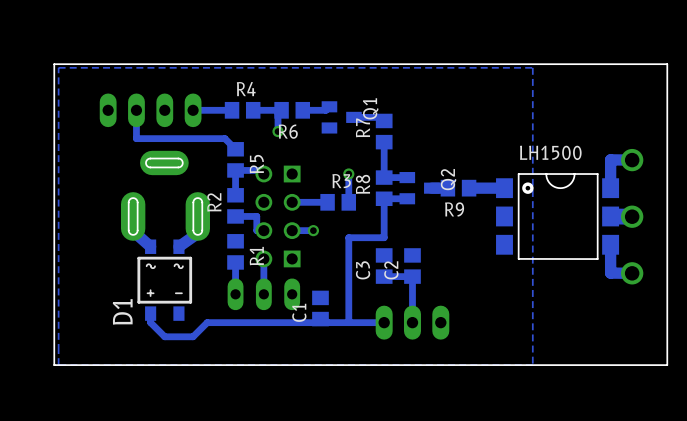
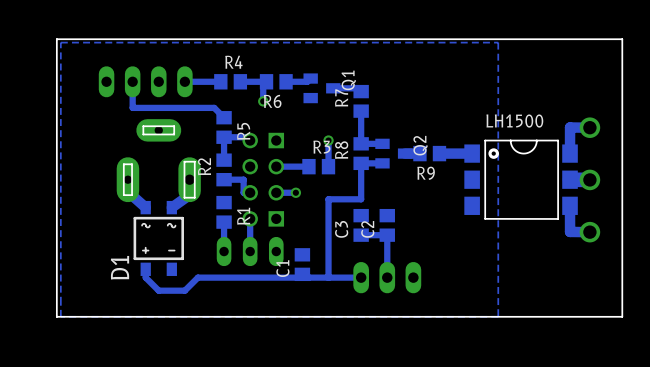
part footprint: [120, 150, 210, 241] -> [116, 119, 201, 203]

